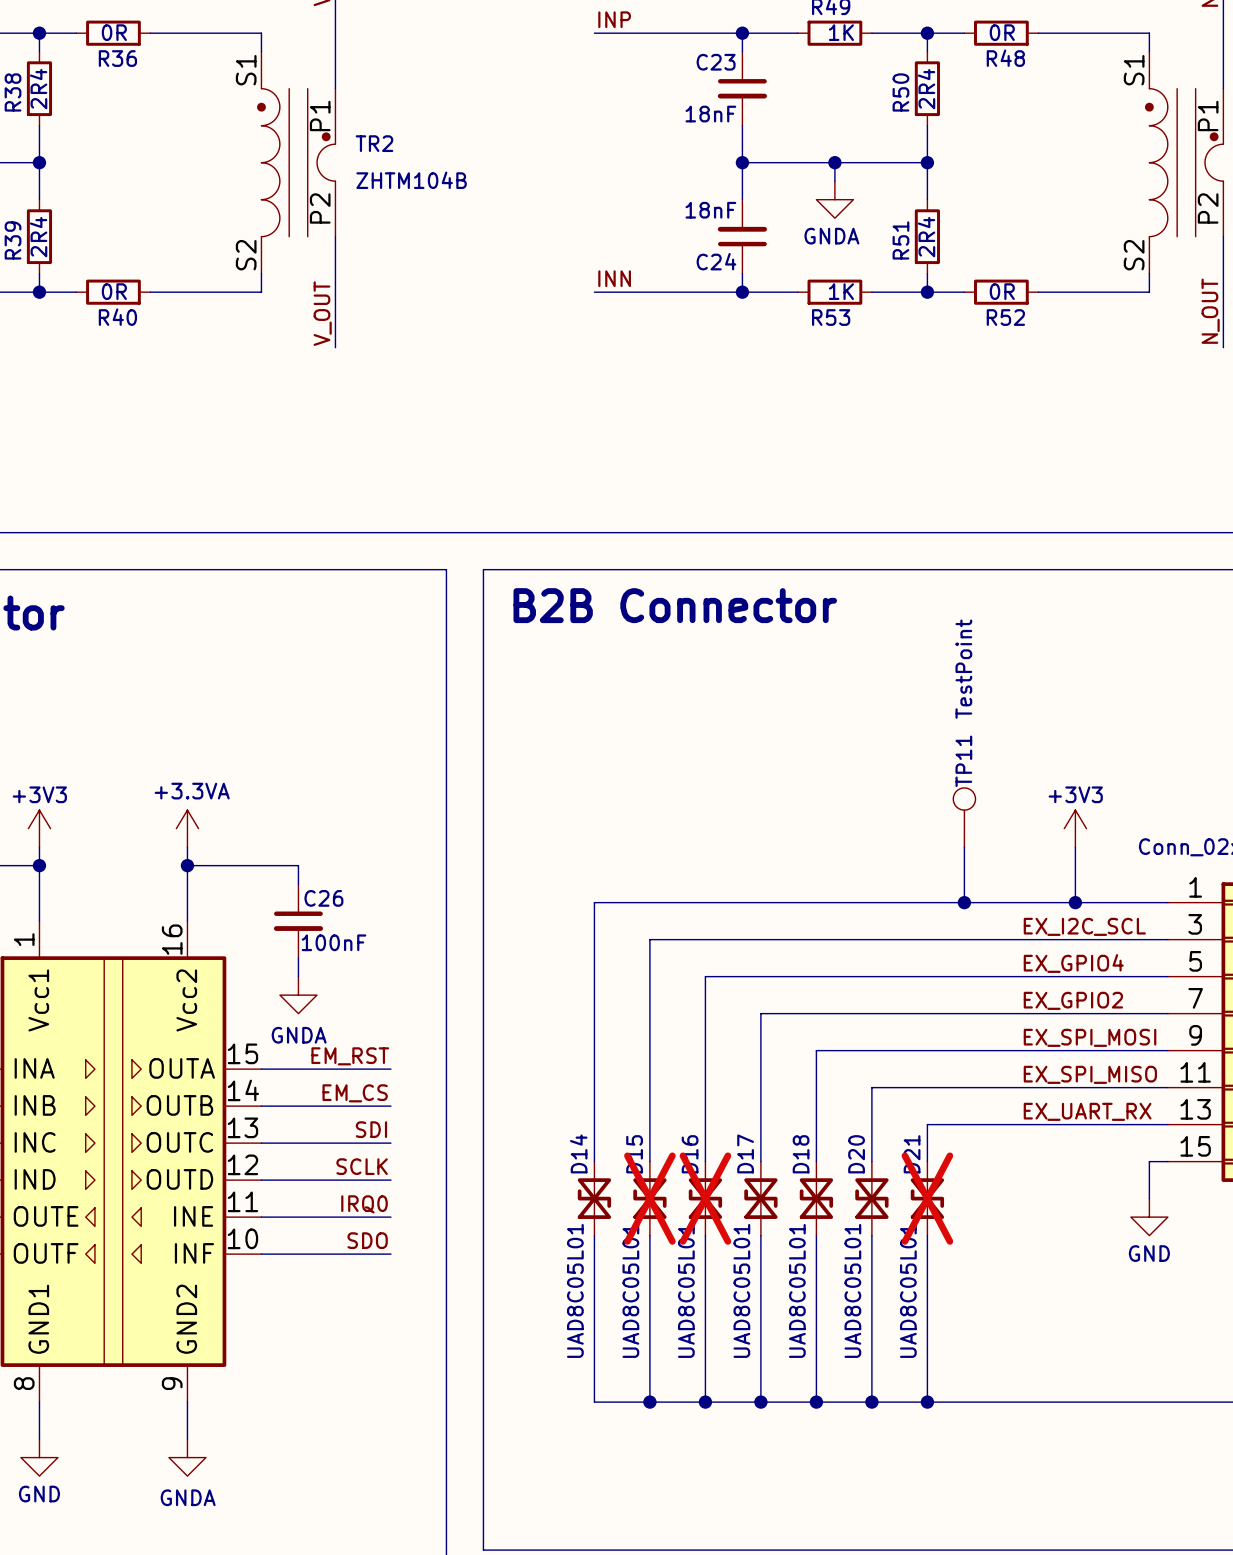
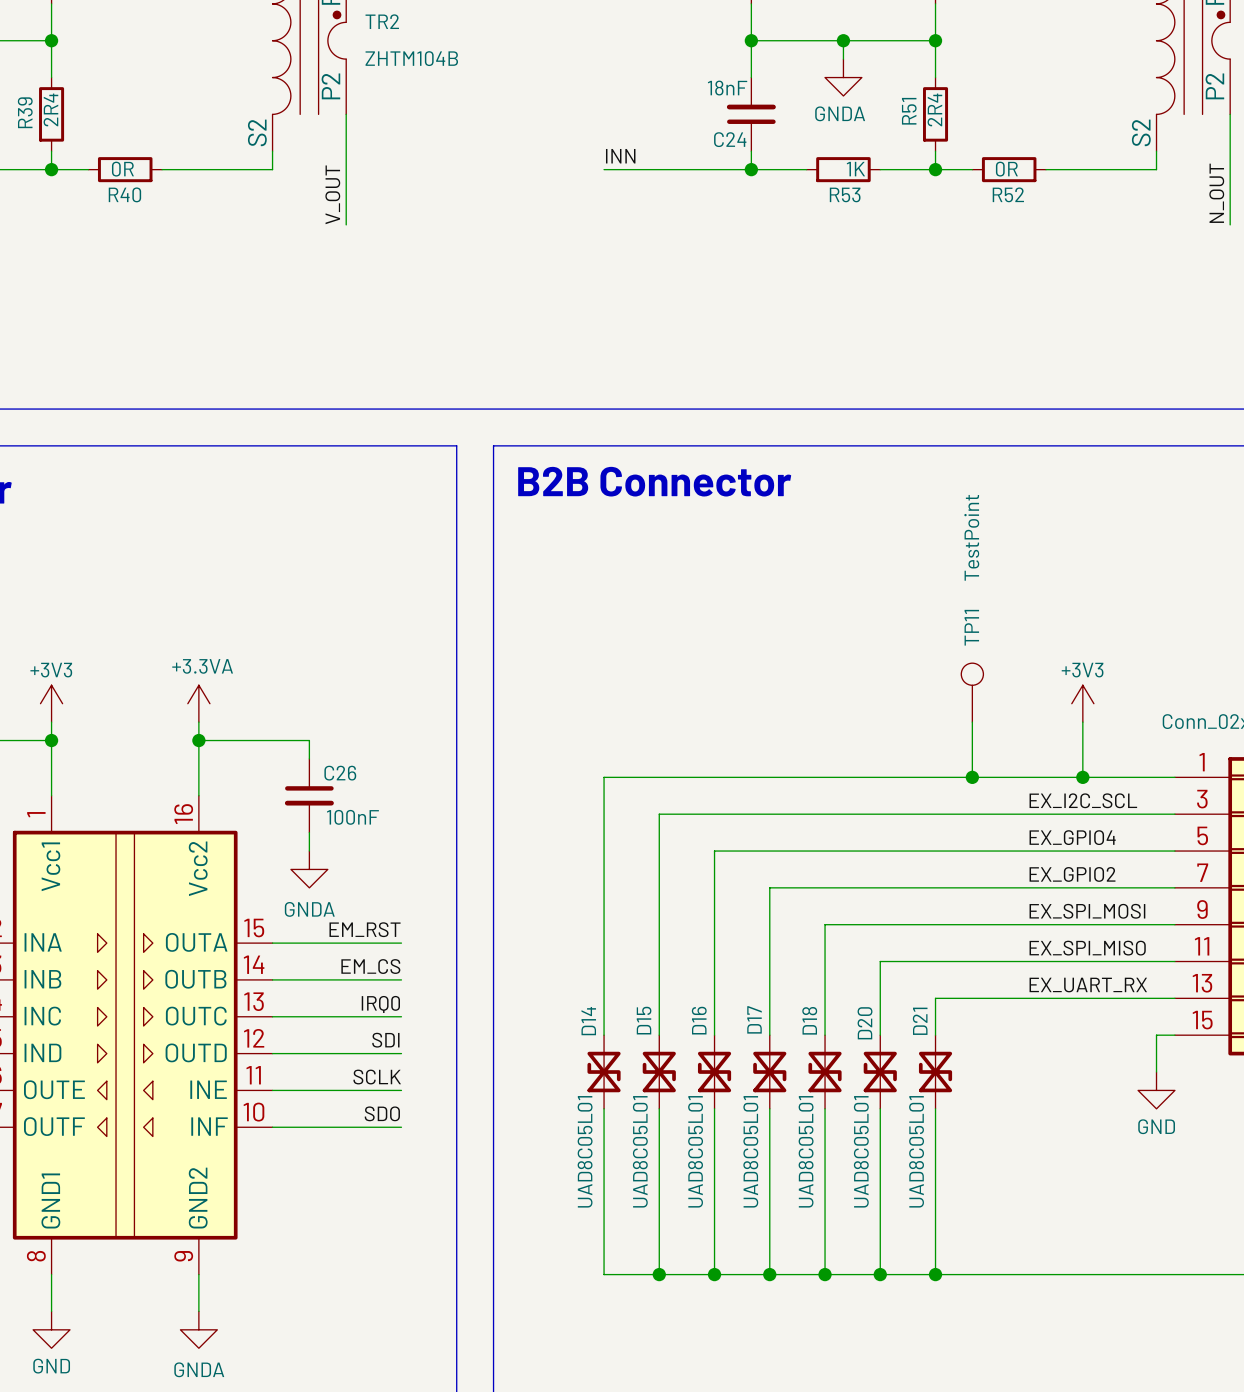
label: SDI (371, 1129) -> IRQ0 (380, 1004)
label: SCLK (362, 1166) -> SDI (385, 1040)
D15 do-not-place cross: (649, 1198) -> none
D16 do-not-place cross: (705, 1198) -> none
D21 do-not-place cross: (927, 1198) -> none
label: IRQ0 (364, 1204) -> SCLK (377, 1077)

